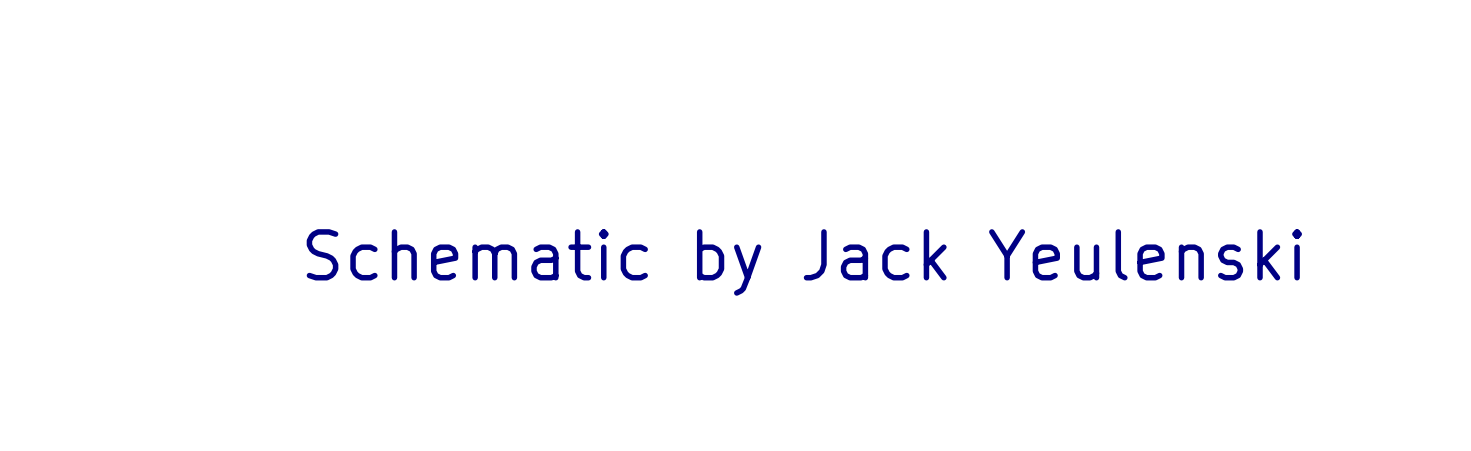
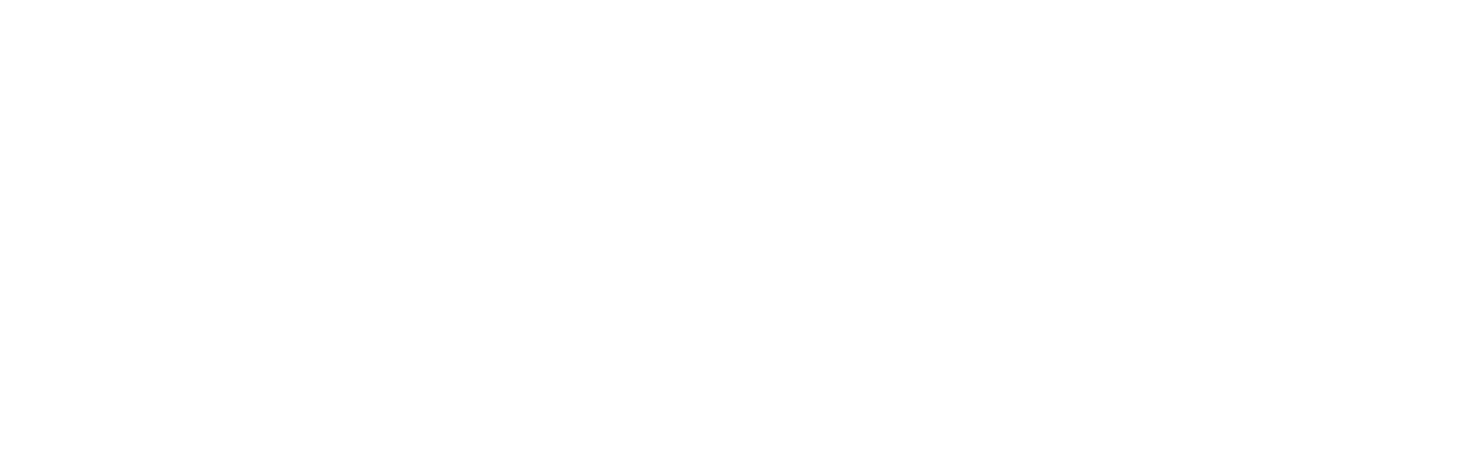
text: Schematic by Jack Yeulenski (804, 262) -> none

